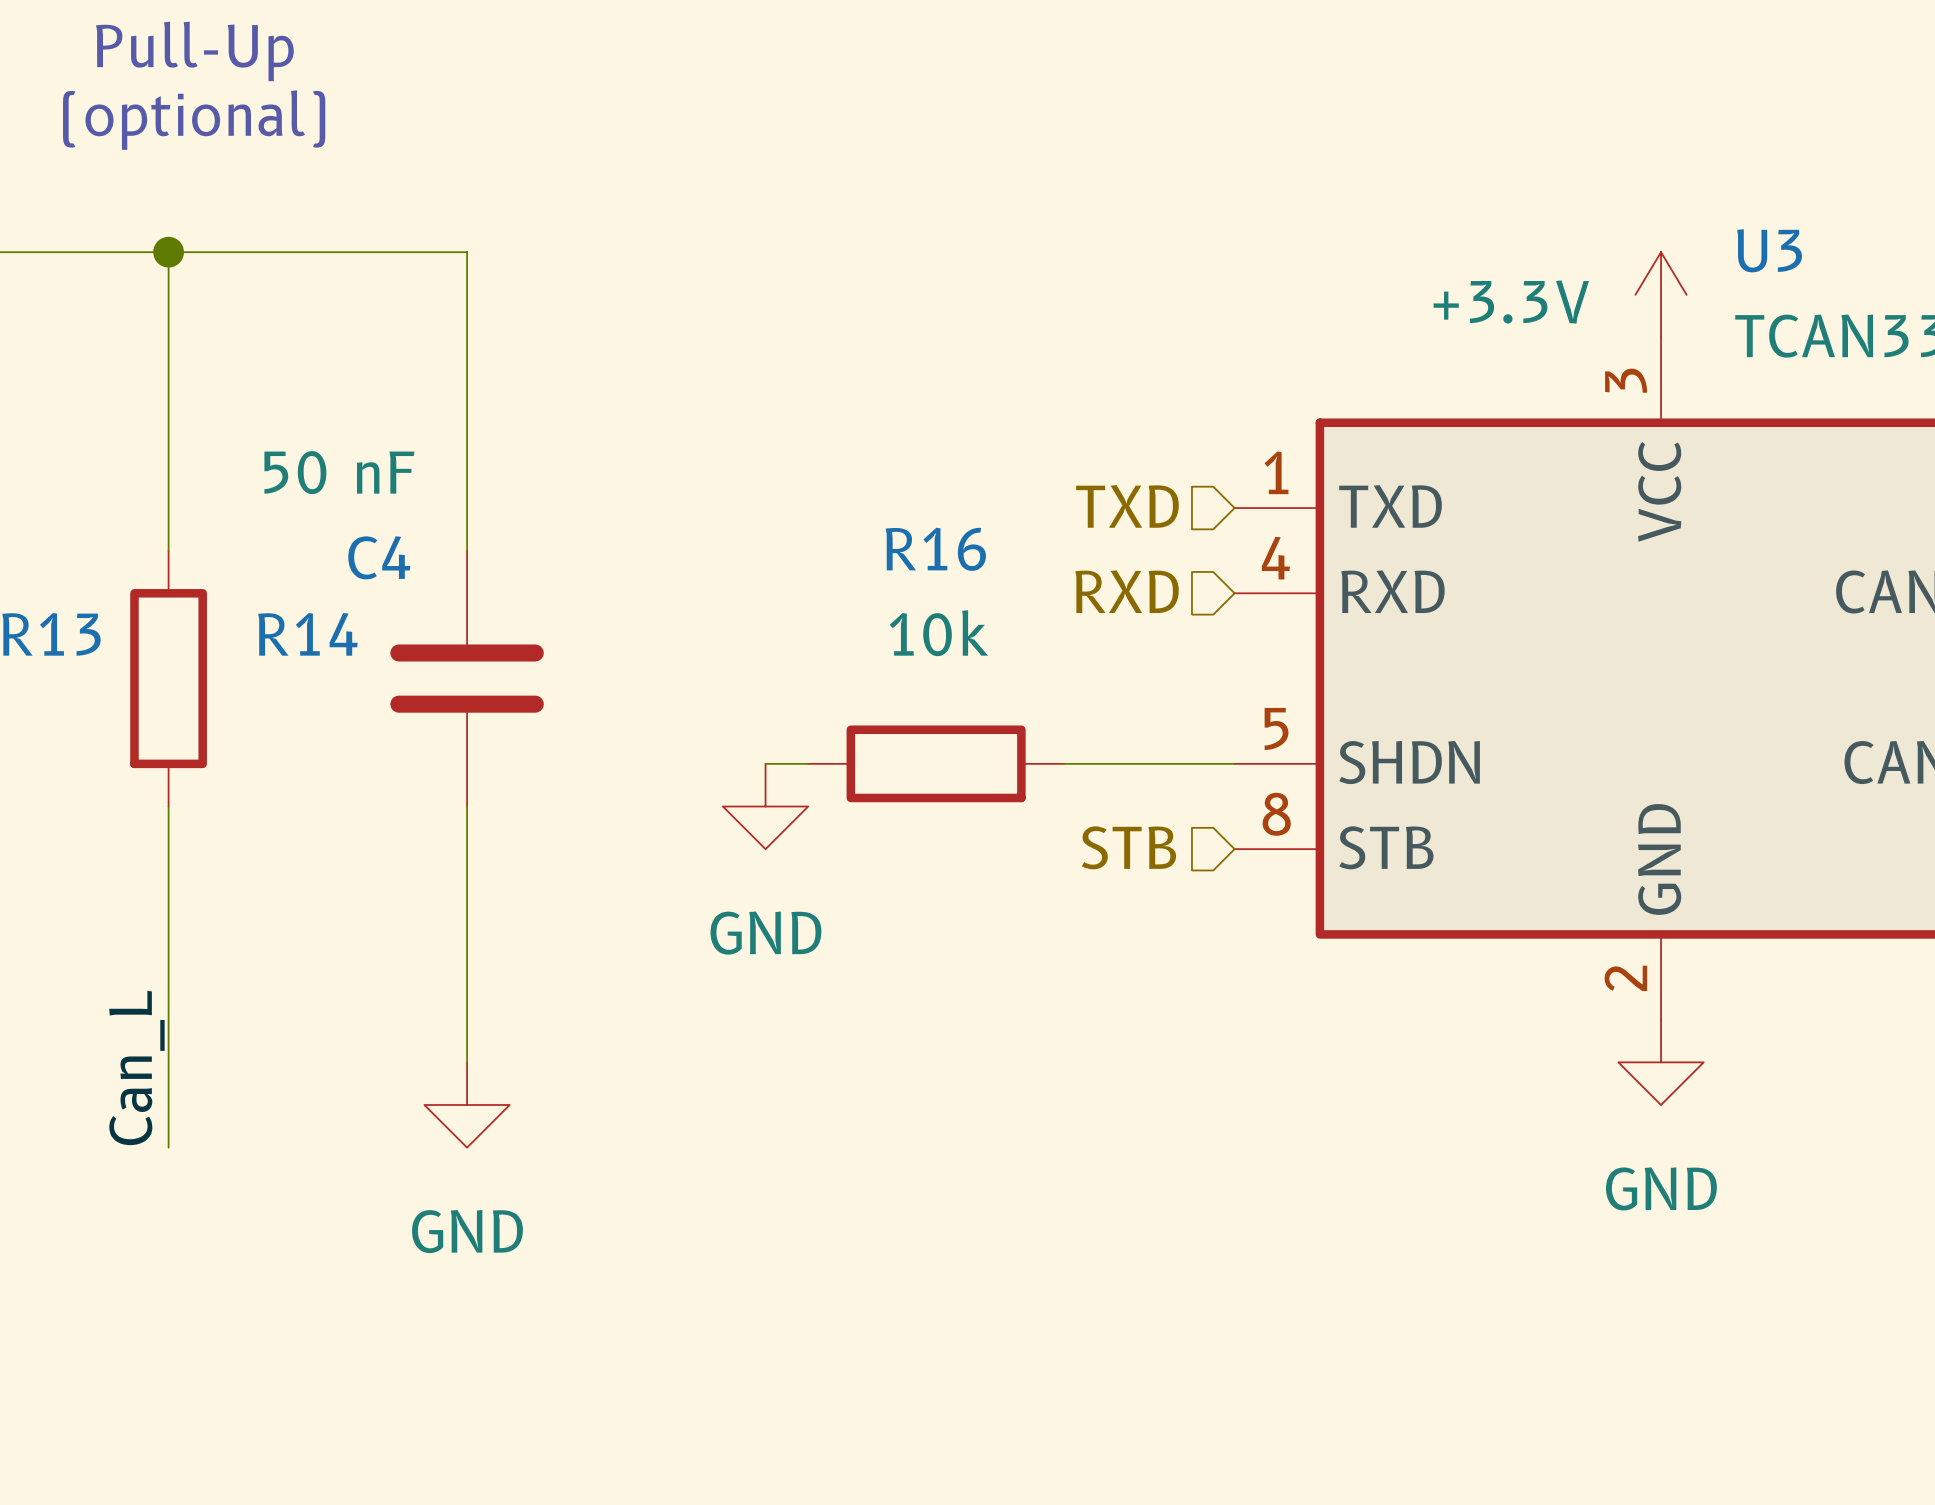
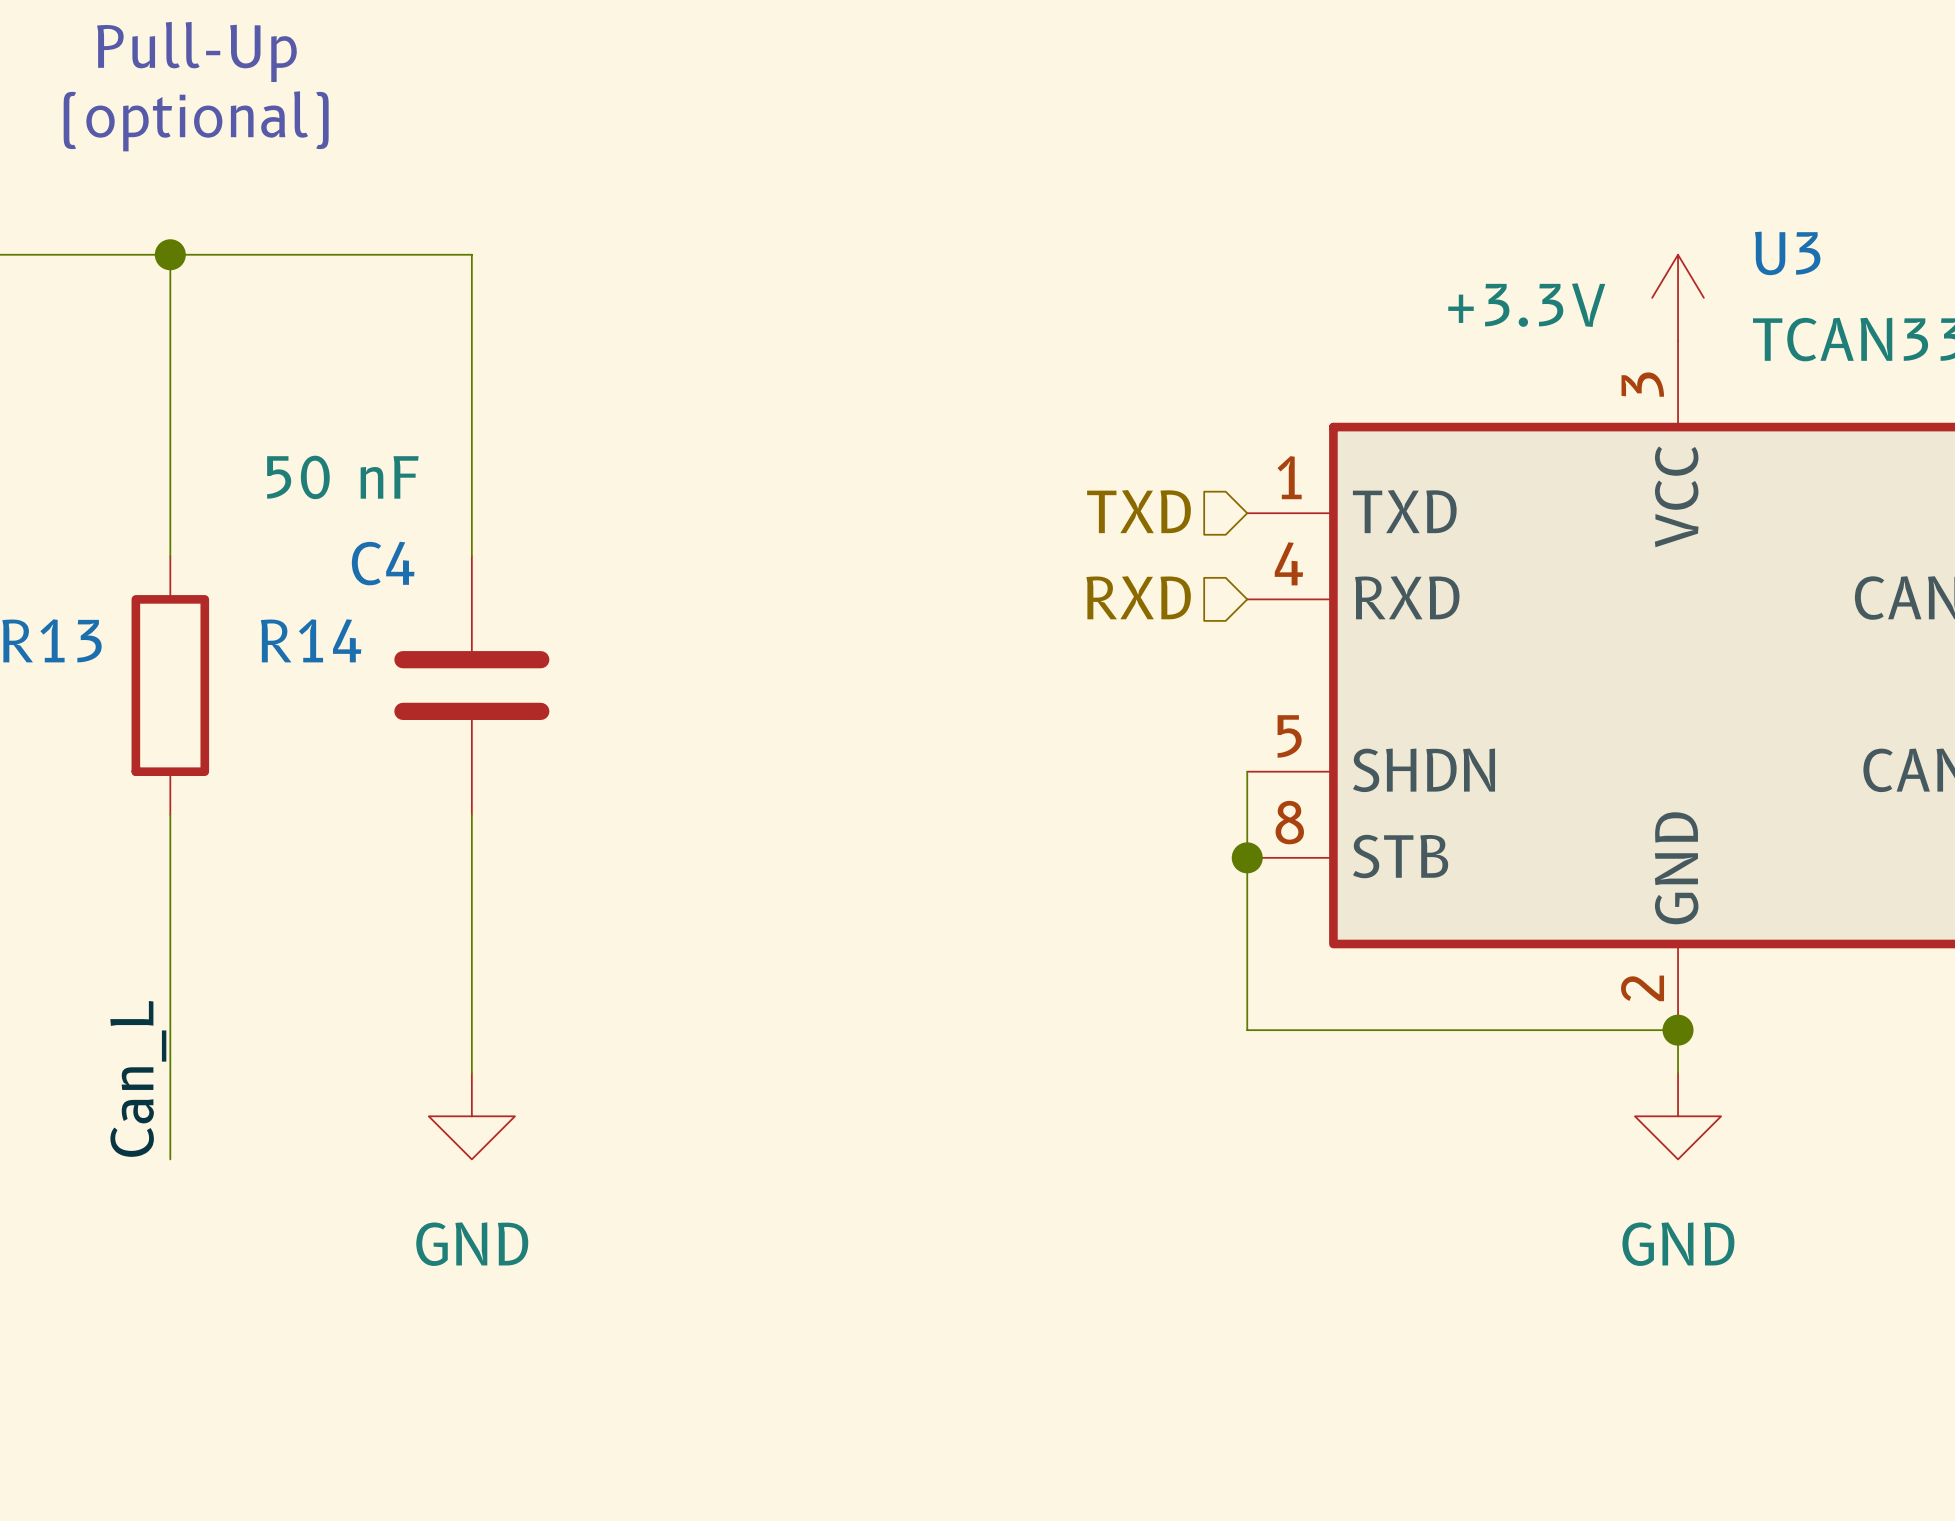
wire: (765, 763) (808, 763) -> none
R16: 10k (936, 763) -> none
wire: (1064, 763) (1234, 763) -> (1678, 1073) (1678, 1030) (1247, 1030) (1247, 771)
power symbol: GND (765, 806) -> none
hierarchical label: STB (1128, 847) -> none
junction: none -> (1247, 857)
junction: none -> (1678, 1030)
power symbol position: GND (1661, 1062) -> GND (1678, 1116)

